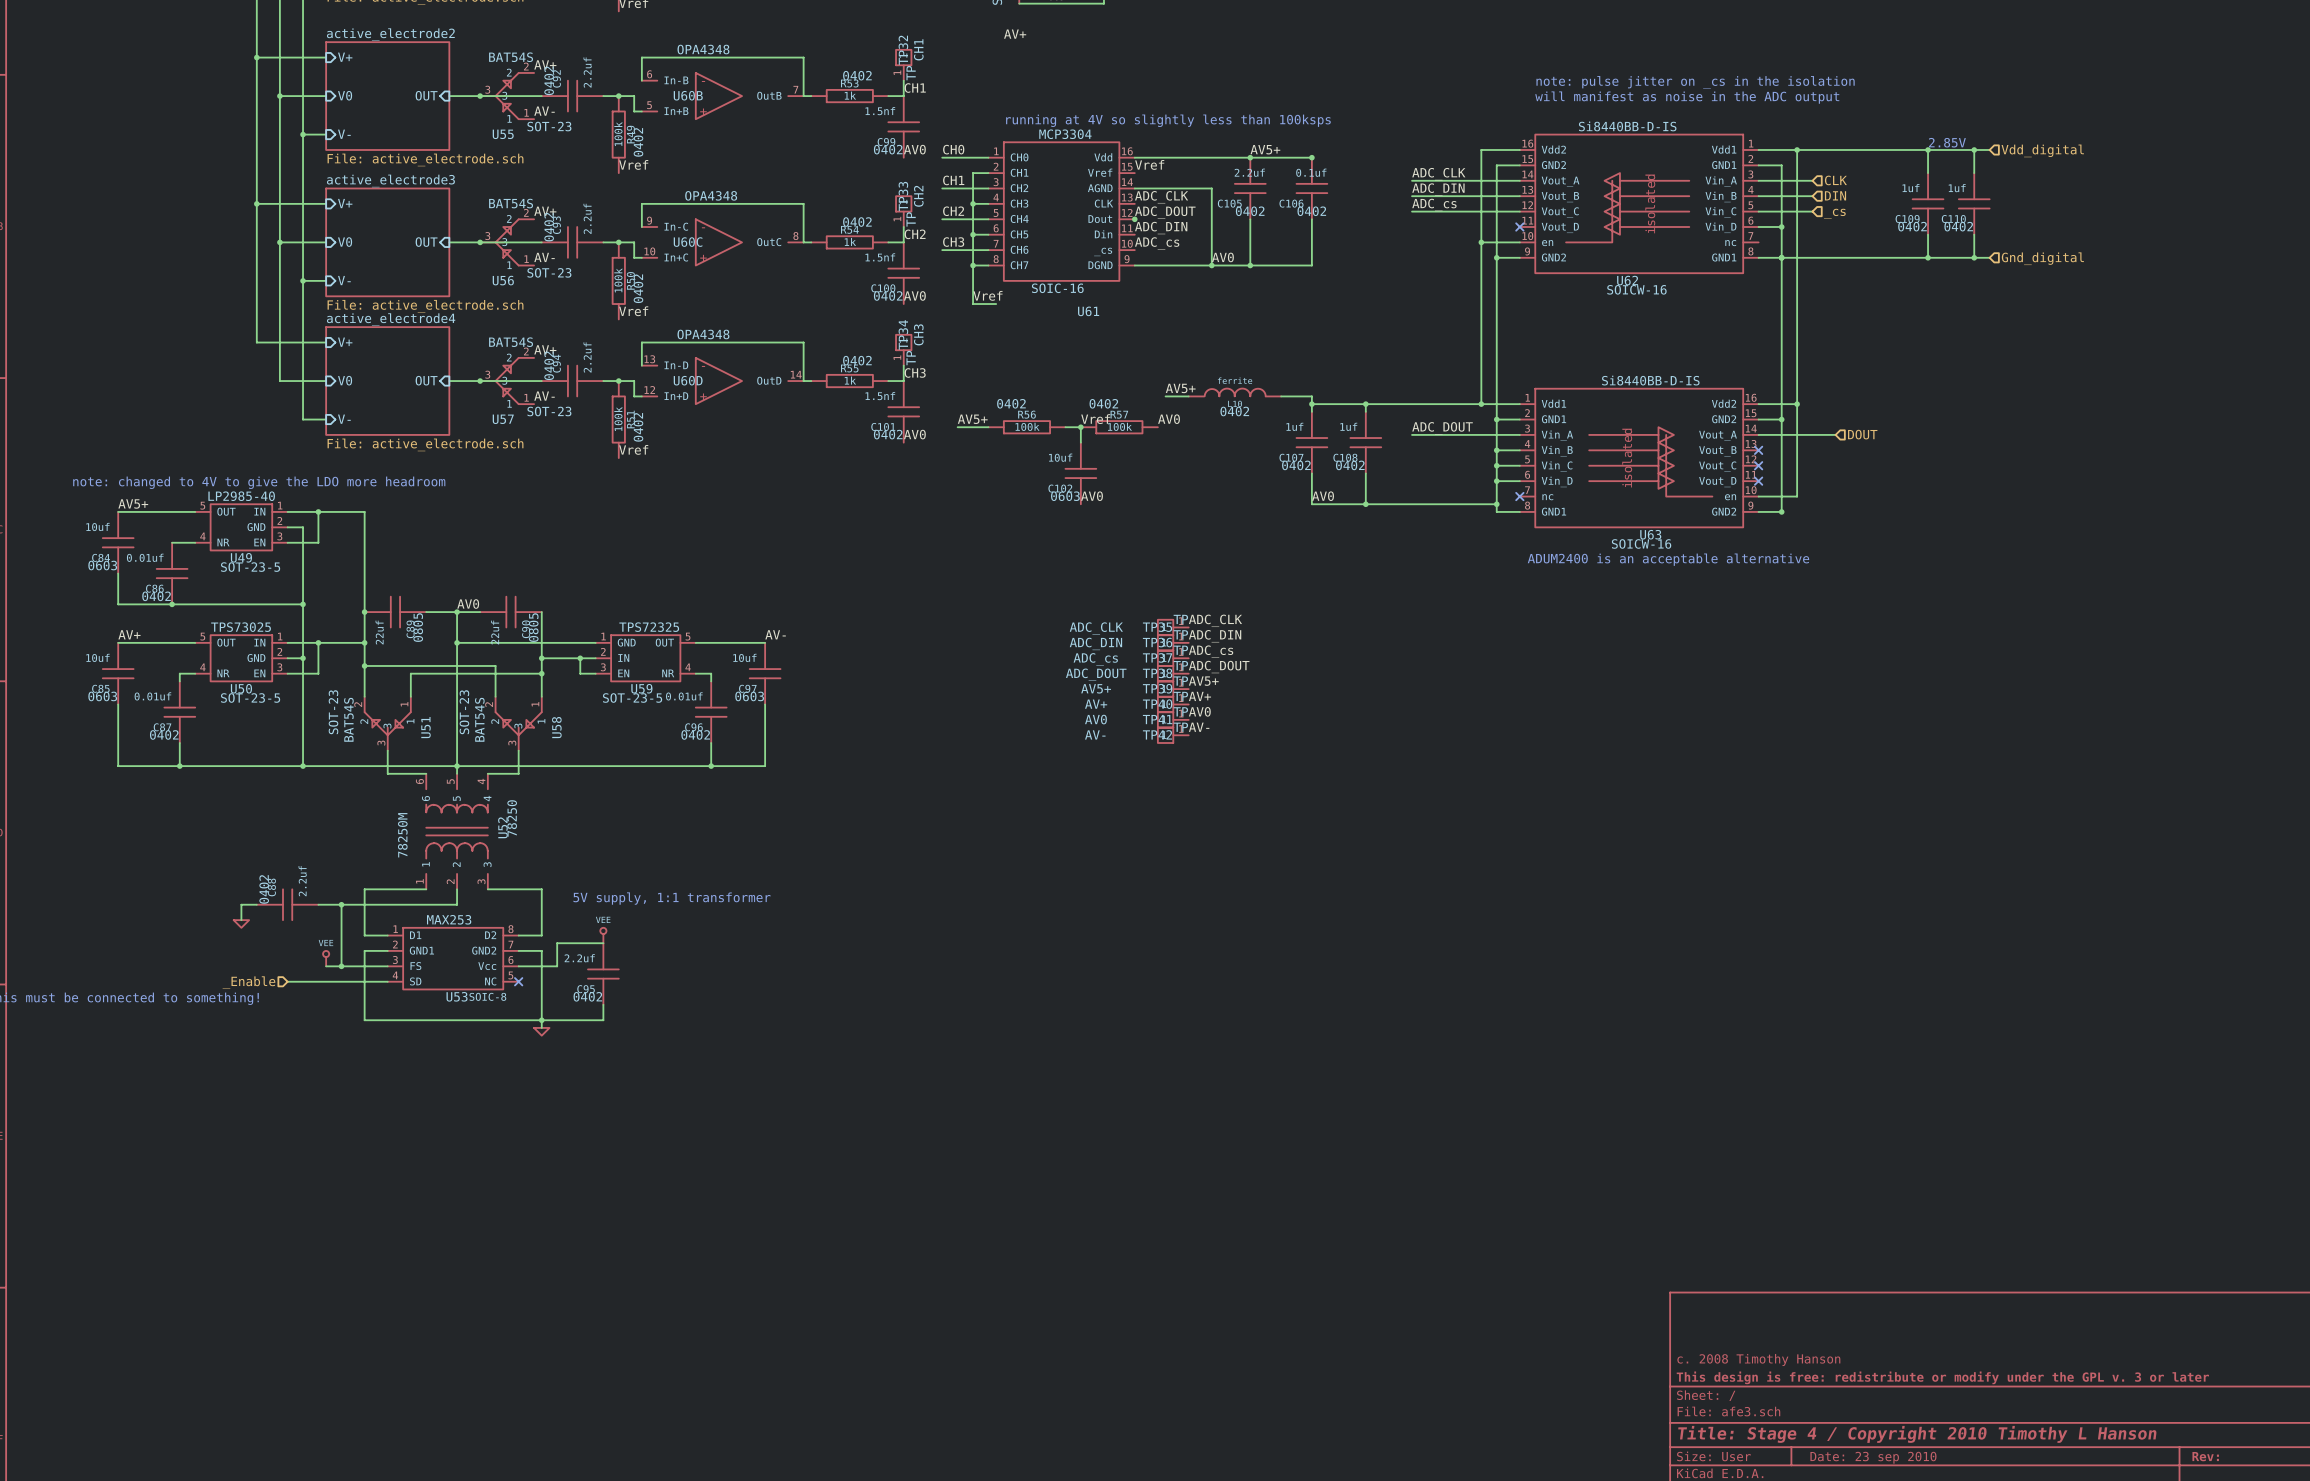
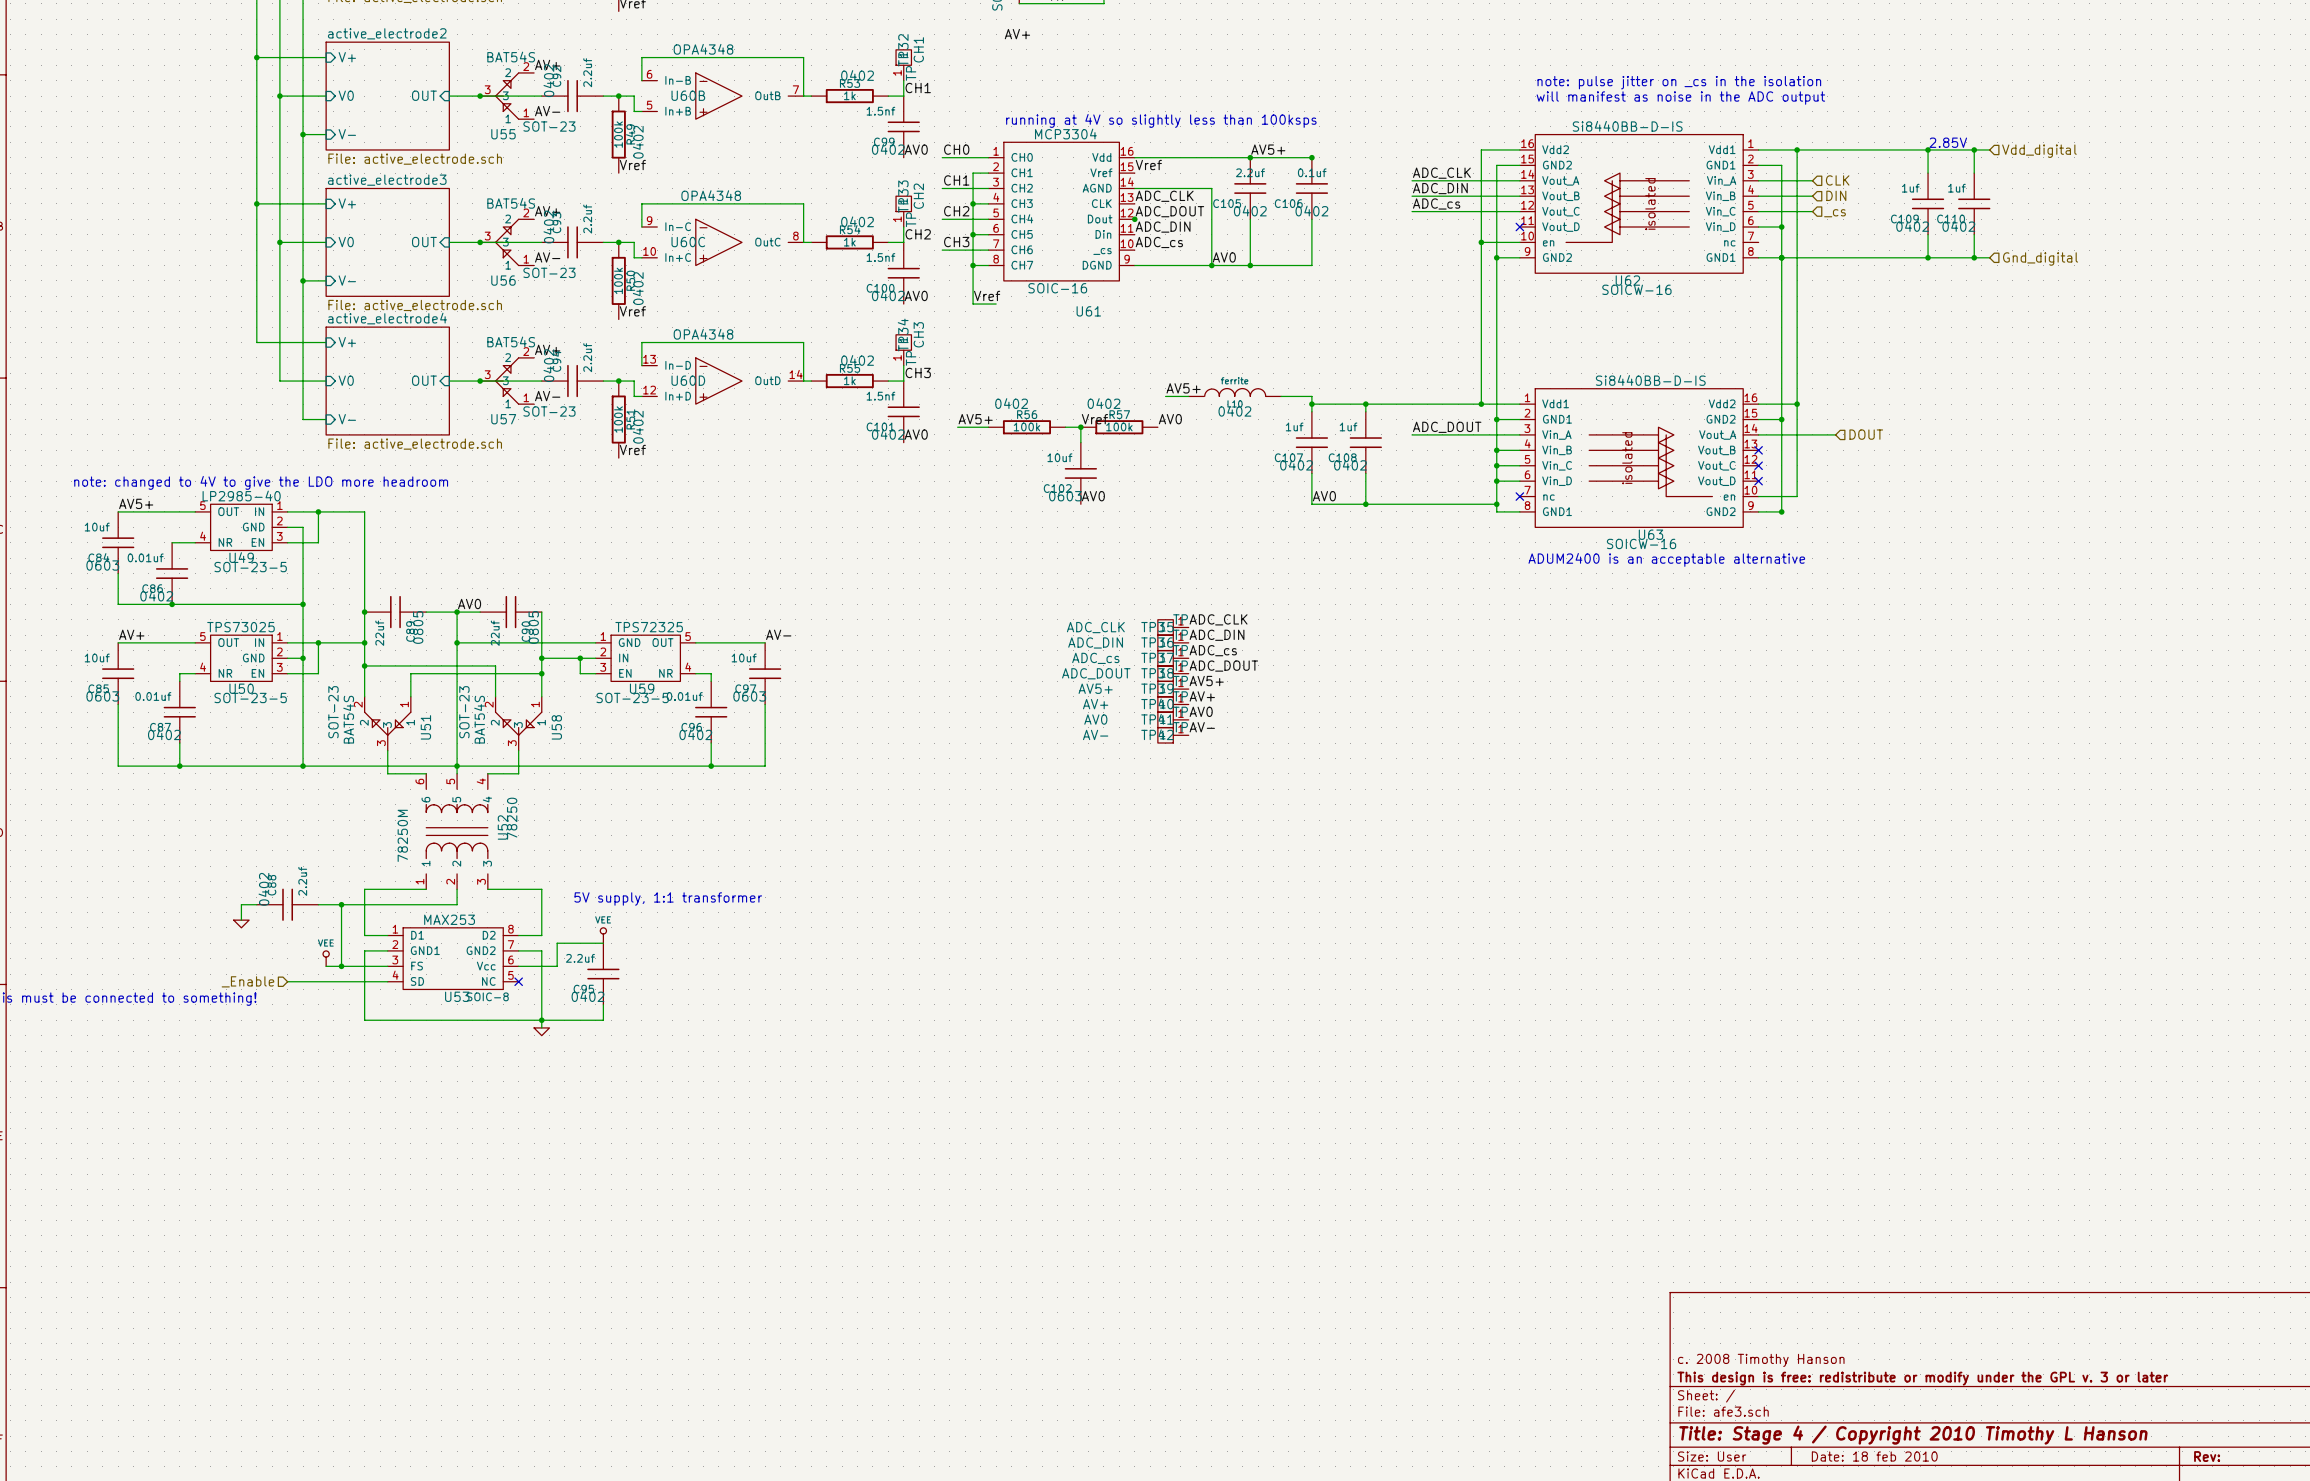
title block: Date: 23 sep 2010 (1873, 1457) -> Date: 18 feb 2010 (1874, 1456)

